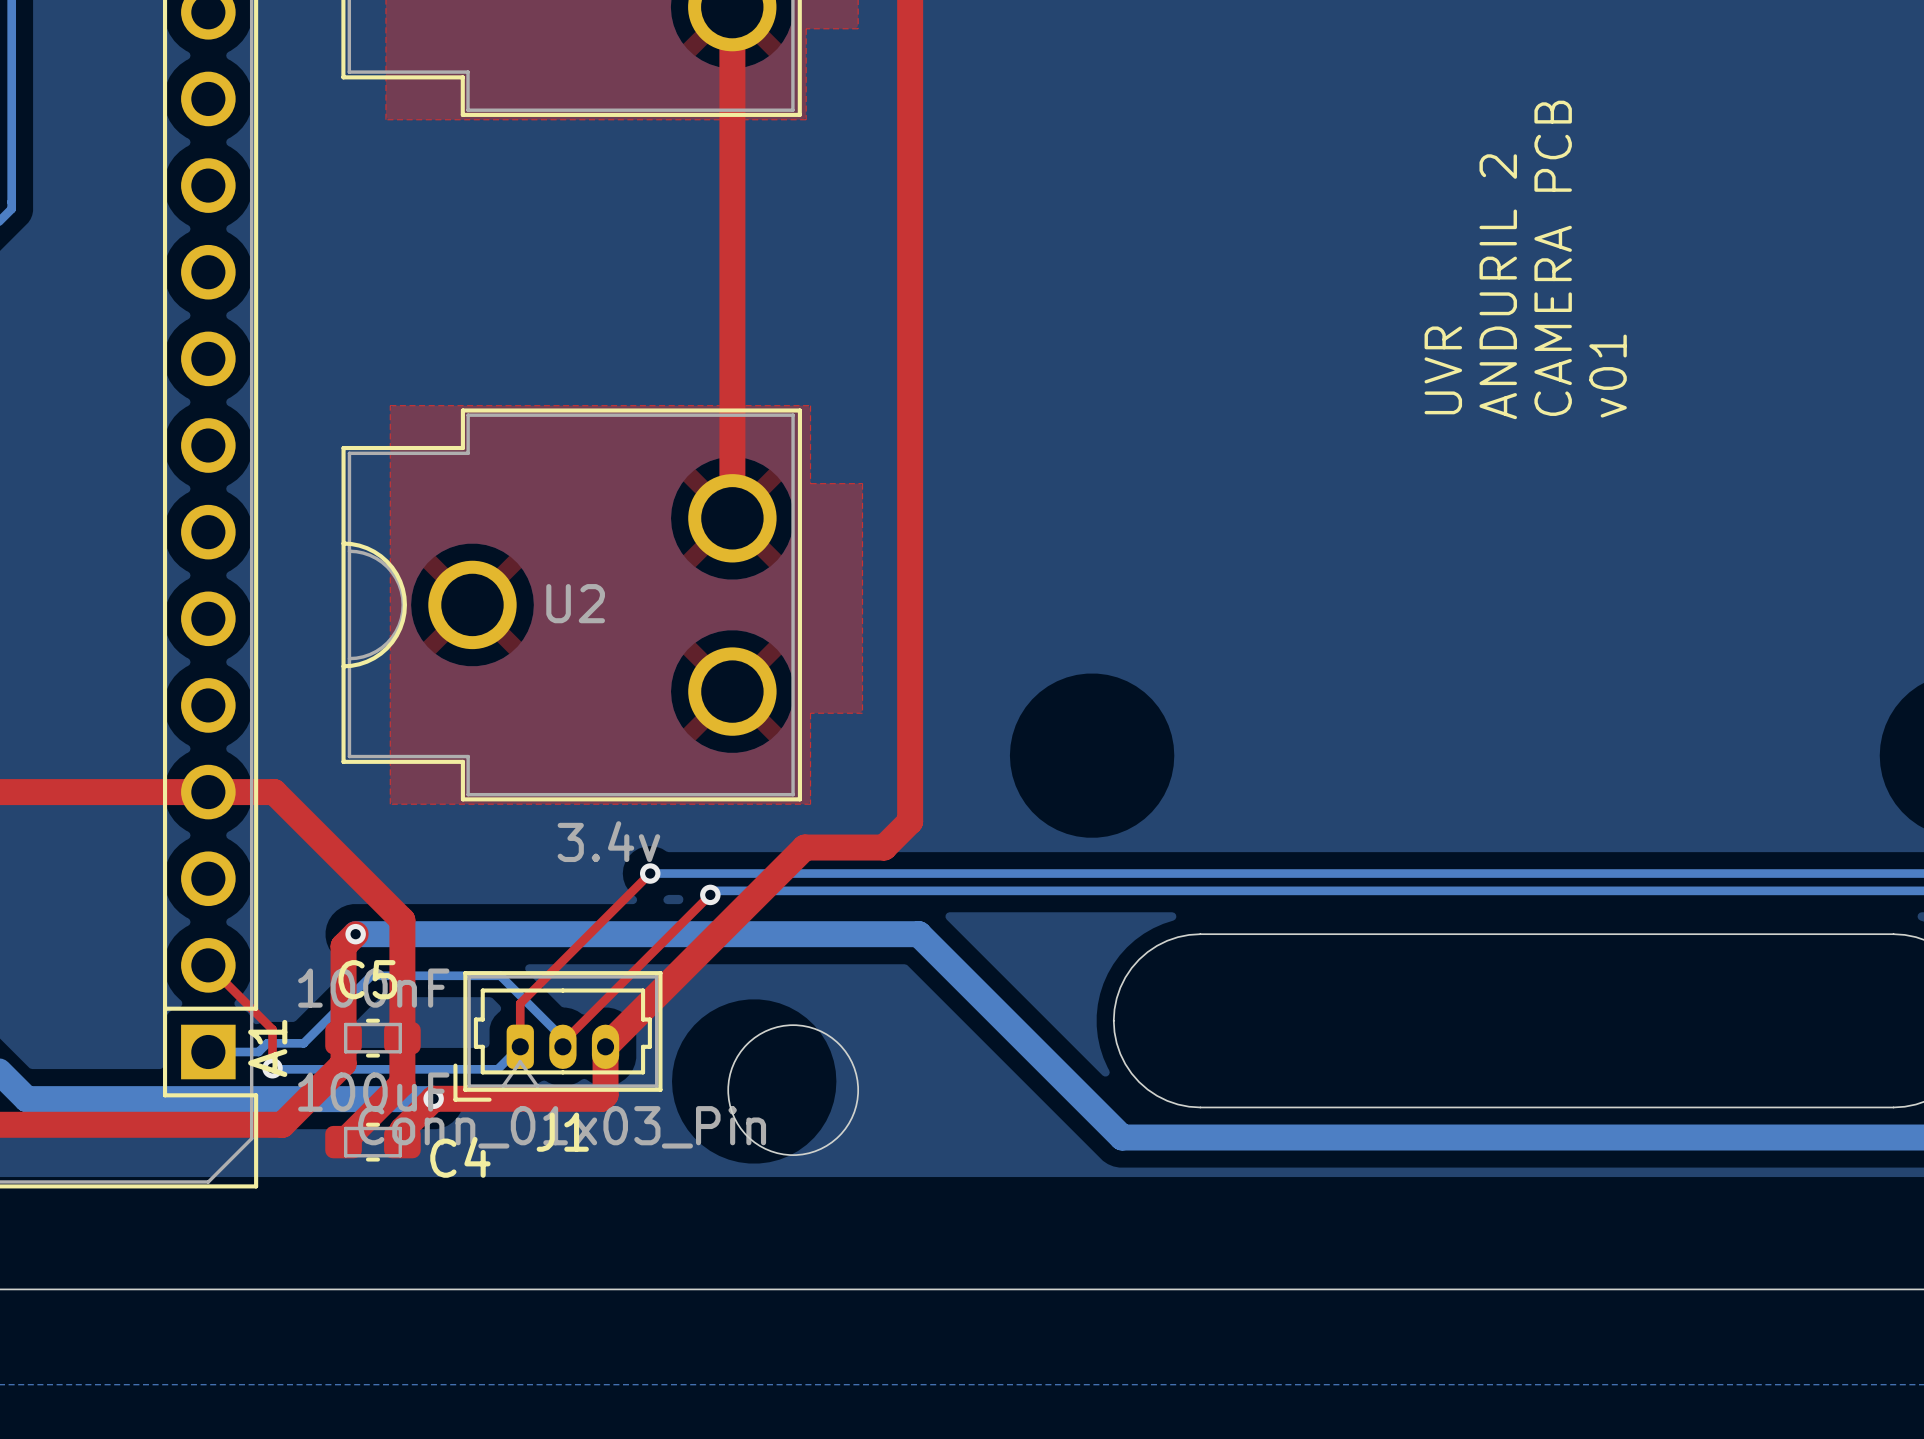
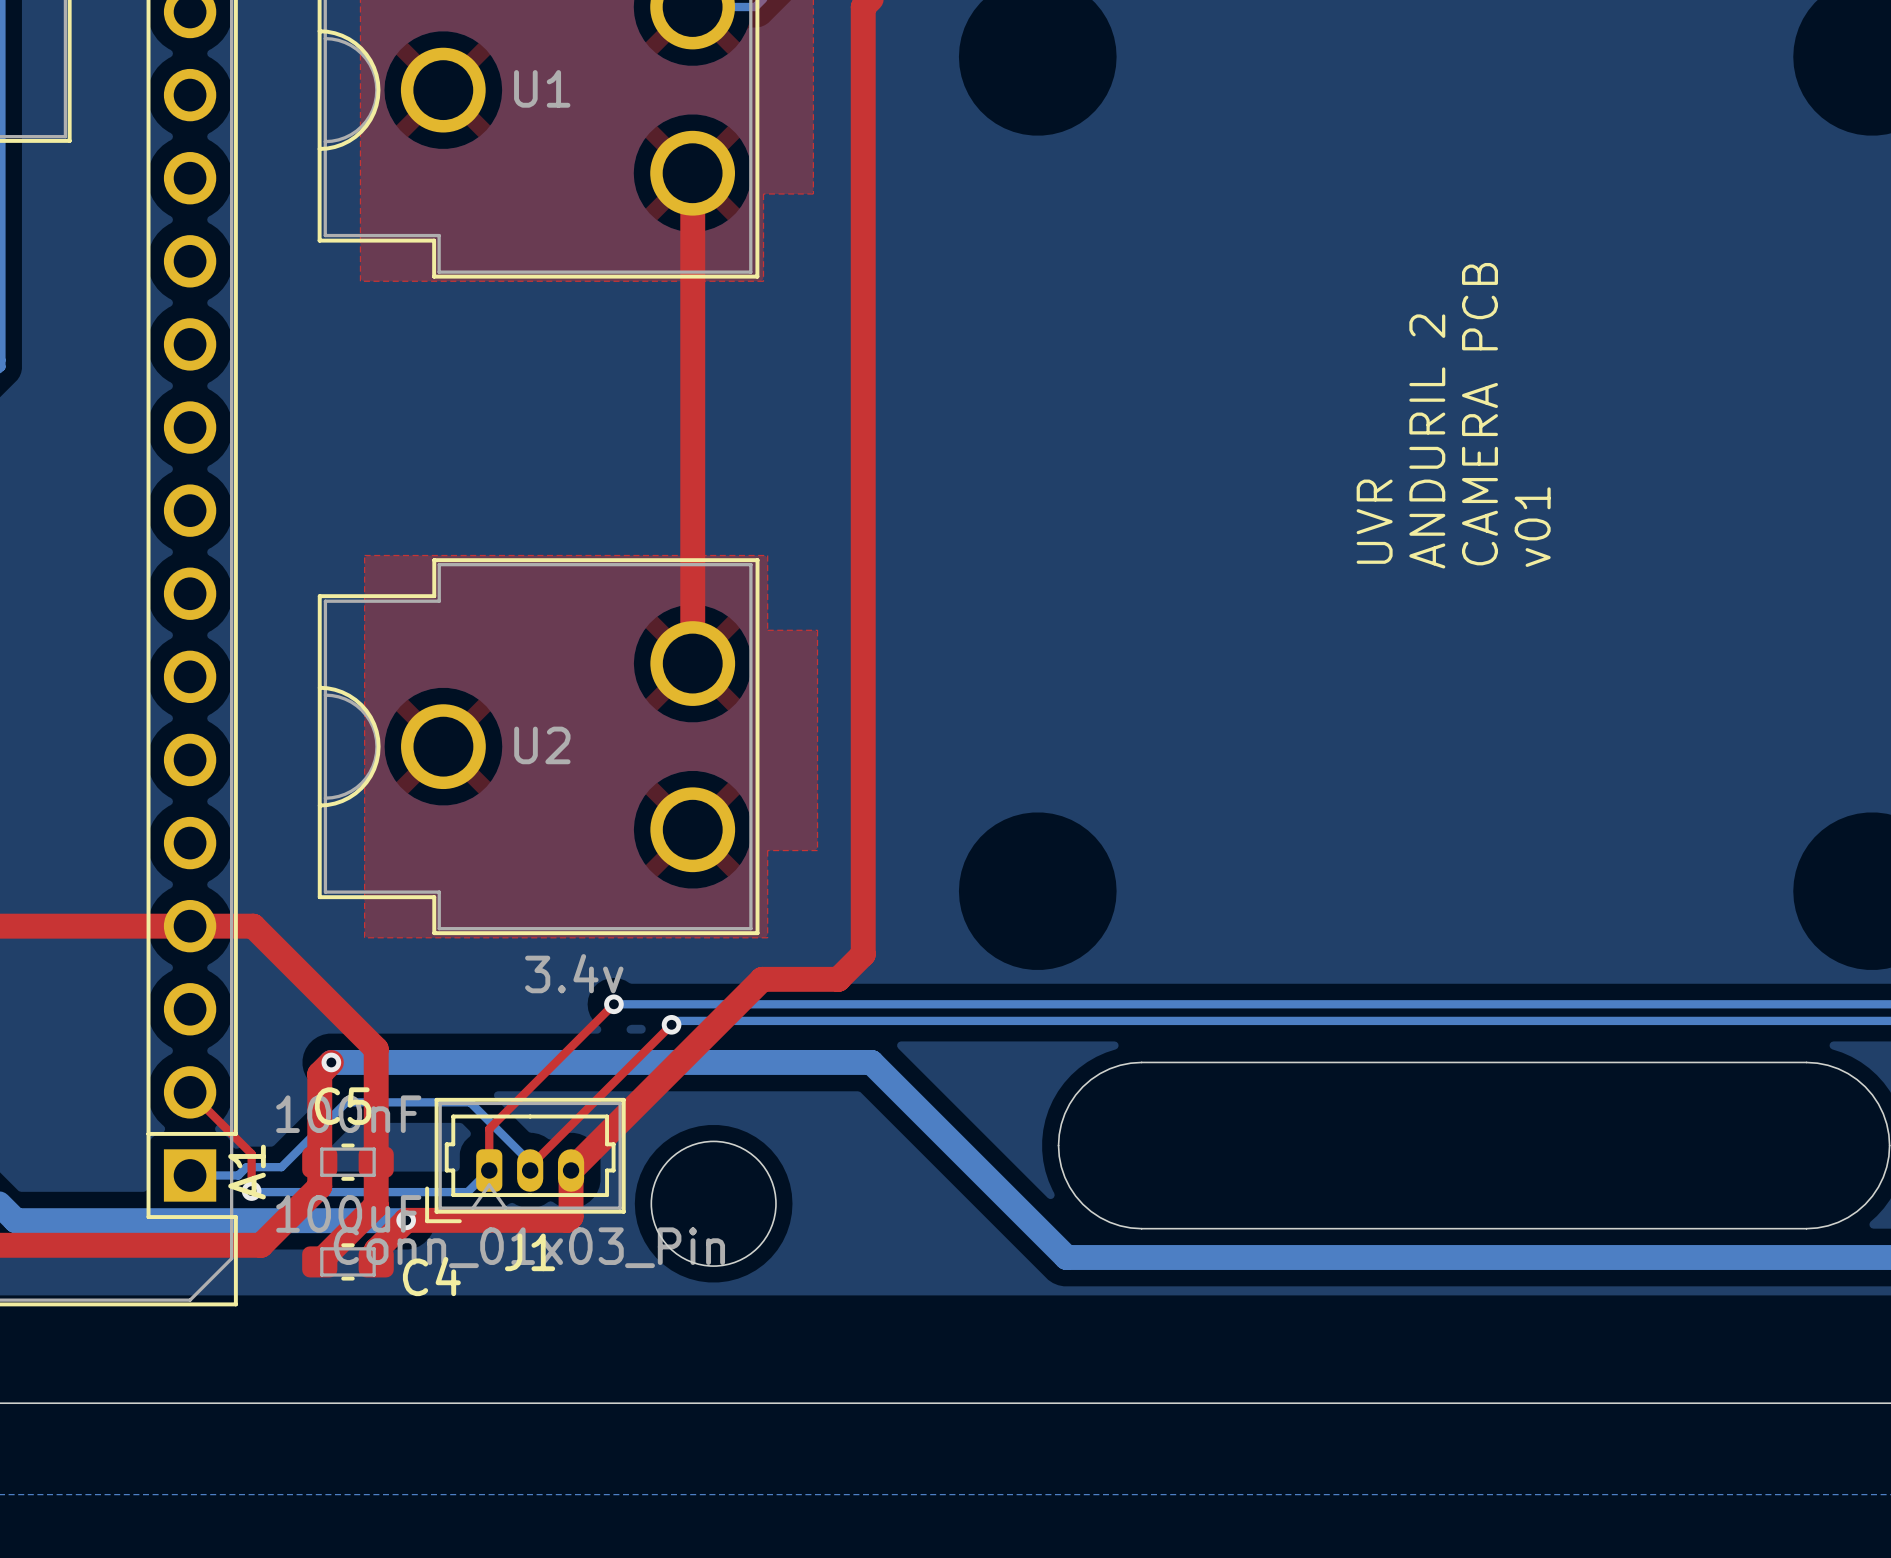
round board edge position: (793, 1090) -> (713, 1203)

